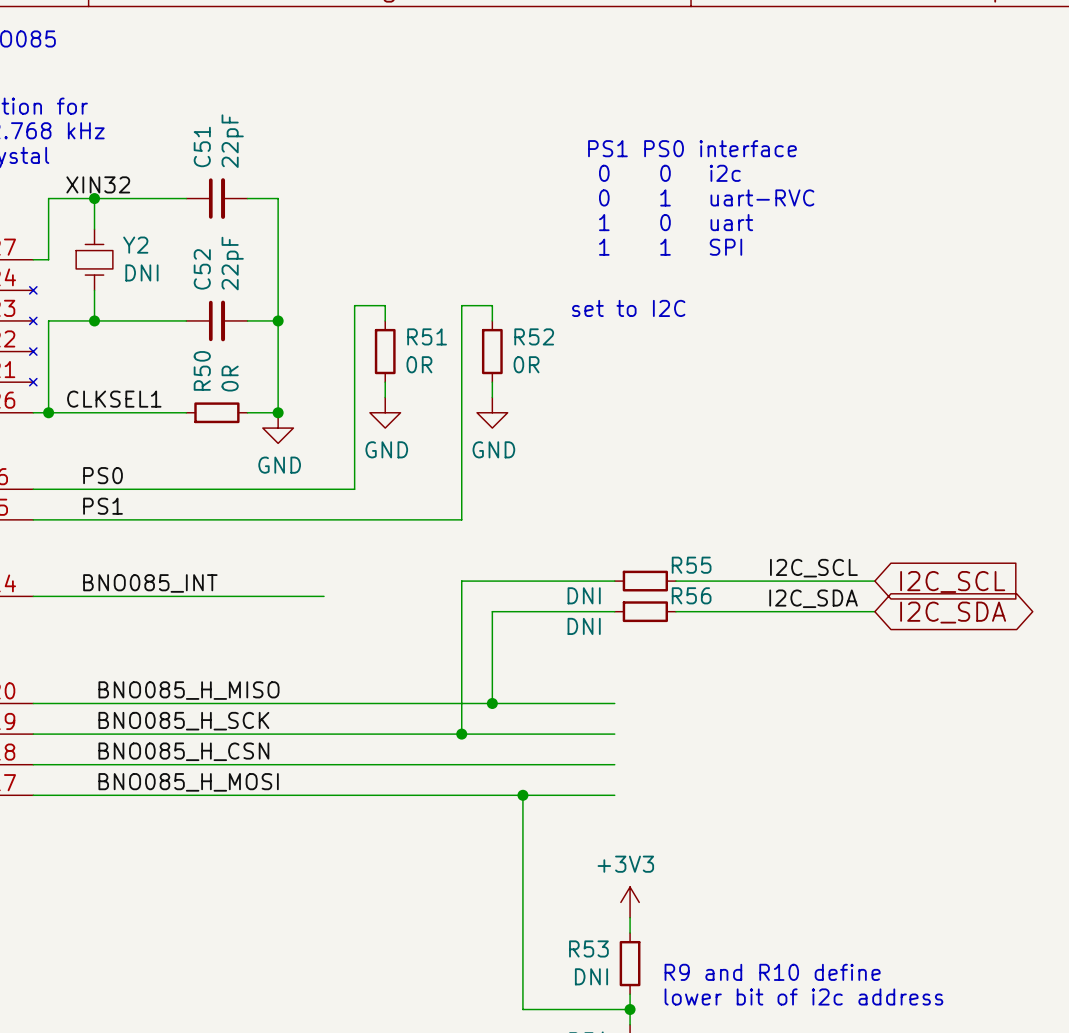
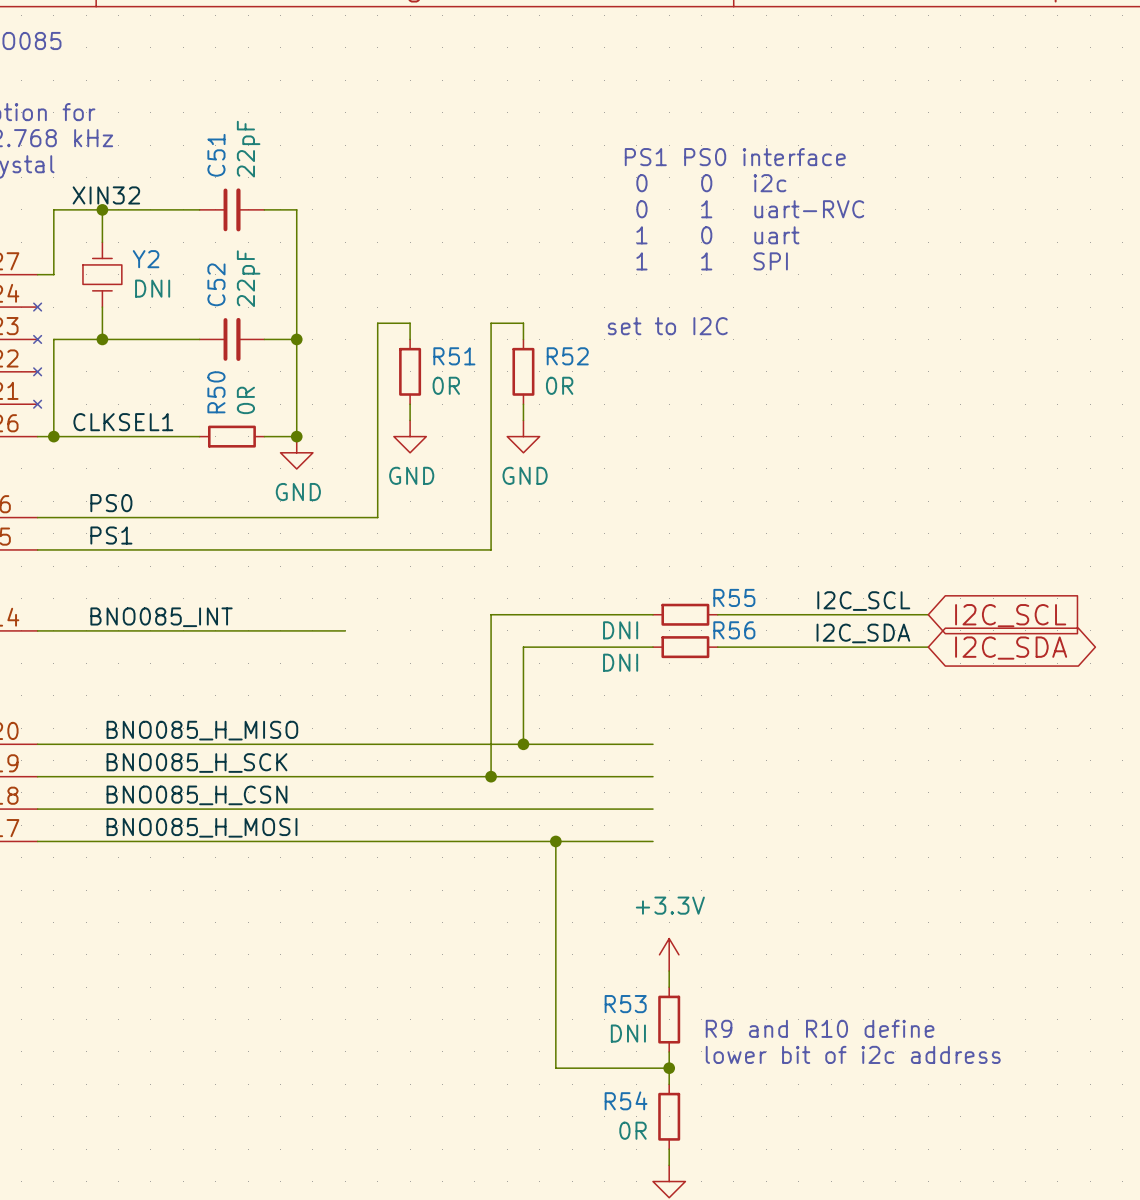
power symbol: +3V3 (630, 902) -> +3.3V (669, 954)

